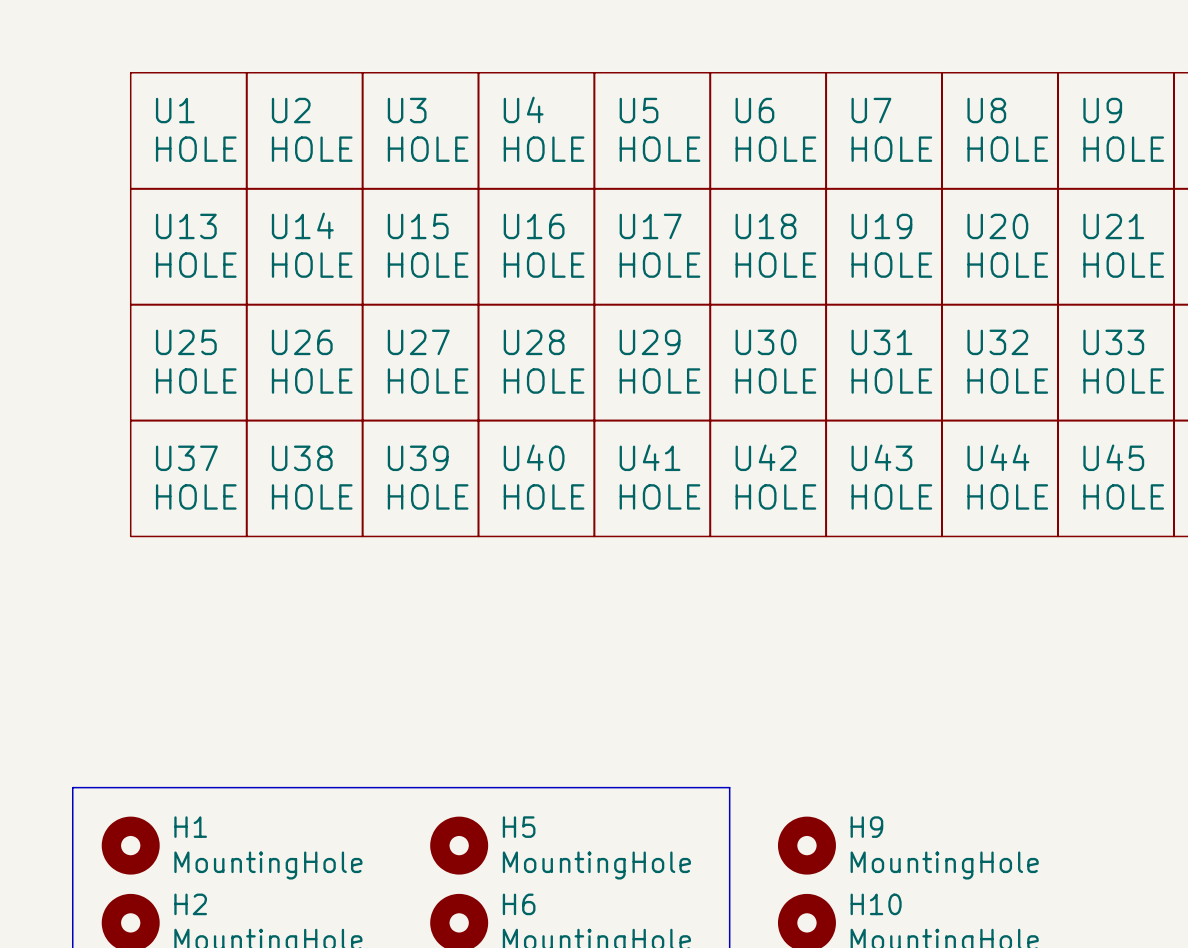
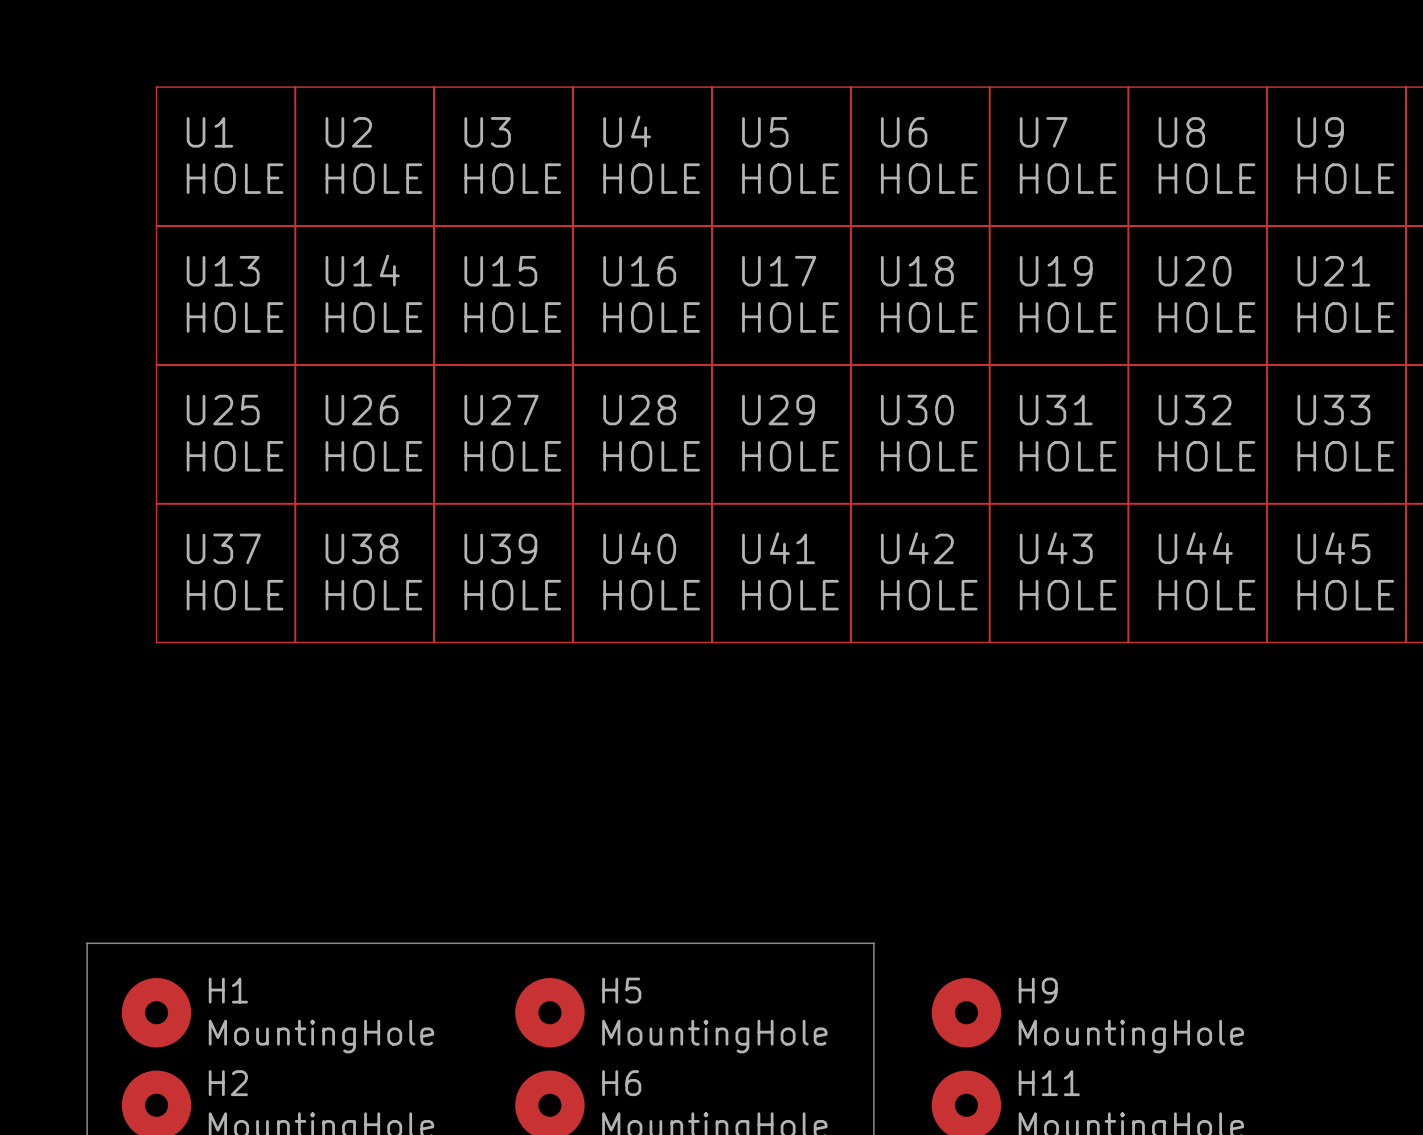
H10 name: H10 (876, 904) -> H11 (1049, 1083)

